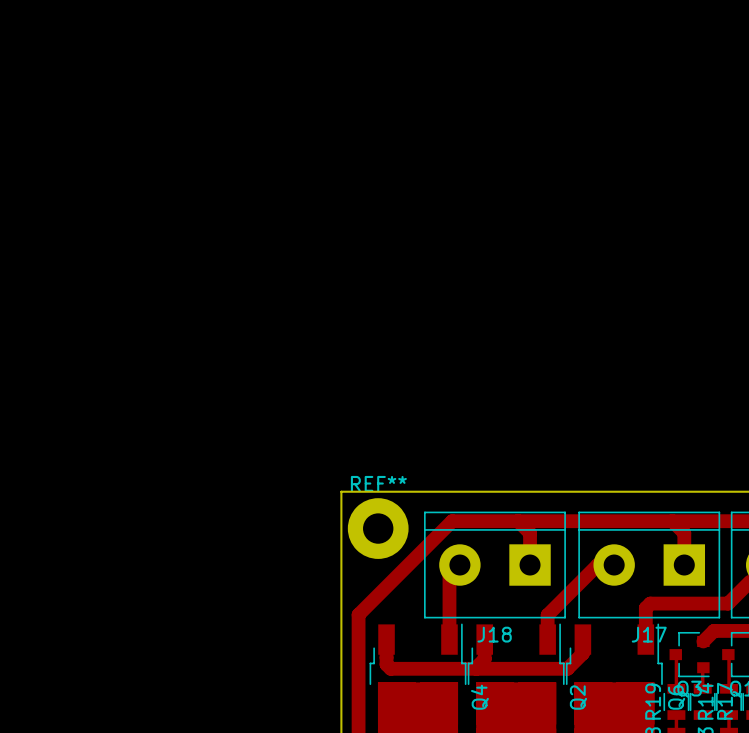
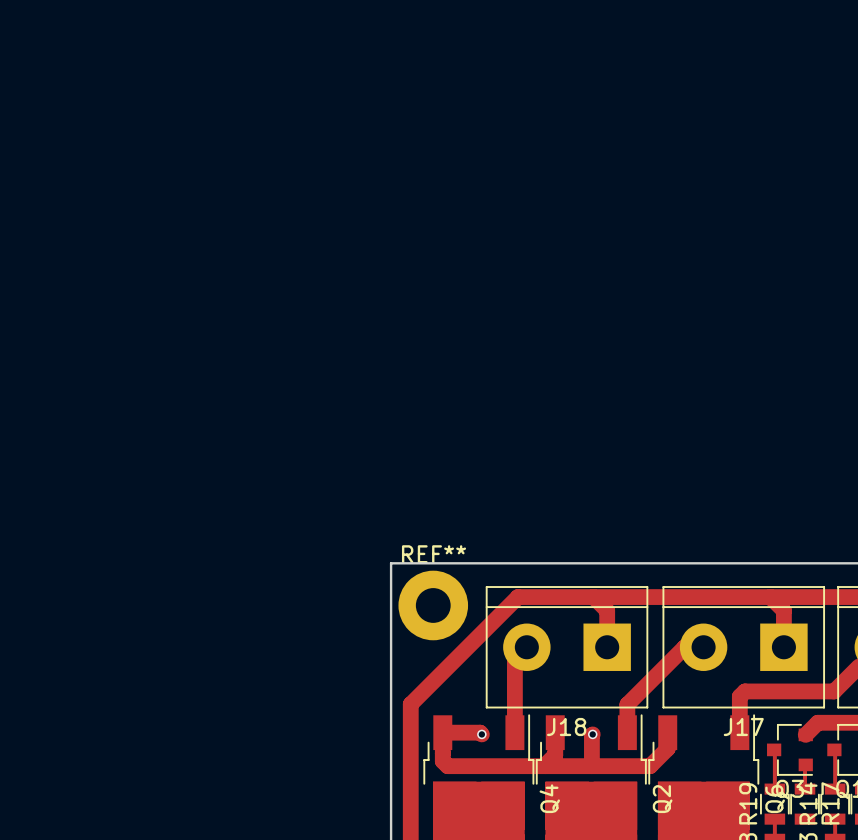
track: none -> (442, 732) (480, 732) (481, 734)
via: none -> (481, 734)
track: none -> (592, 734) (591, 766)
via: none -> (592, 734)

